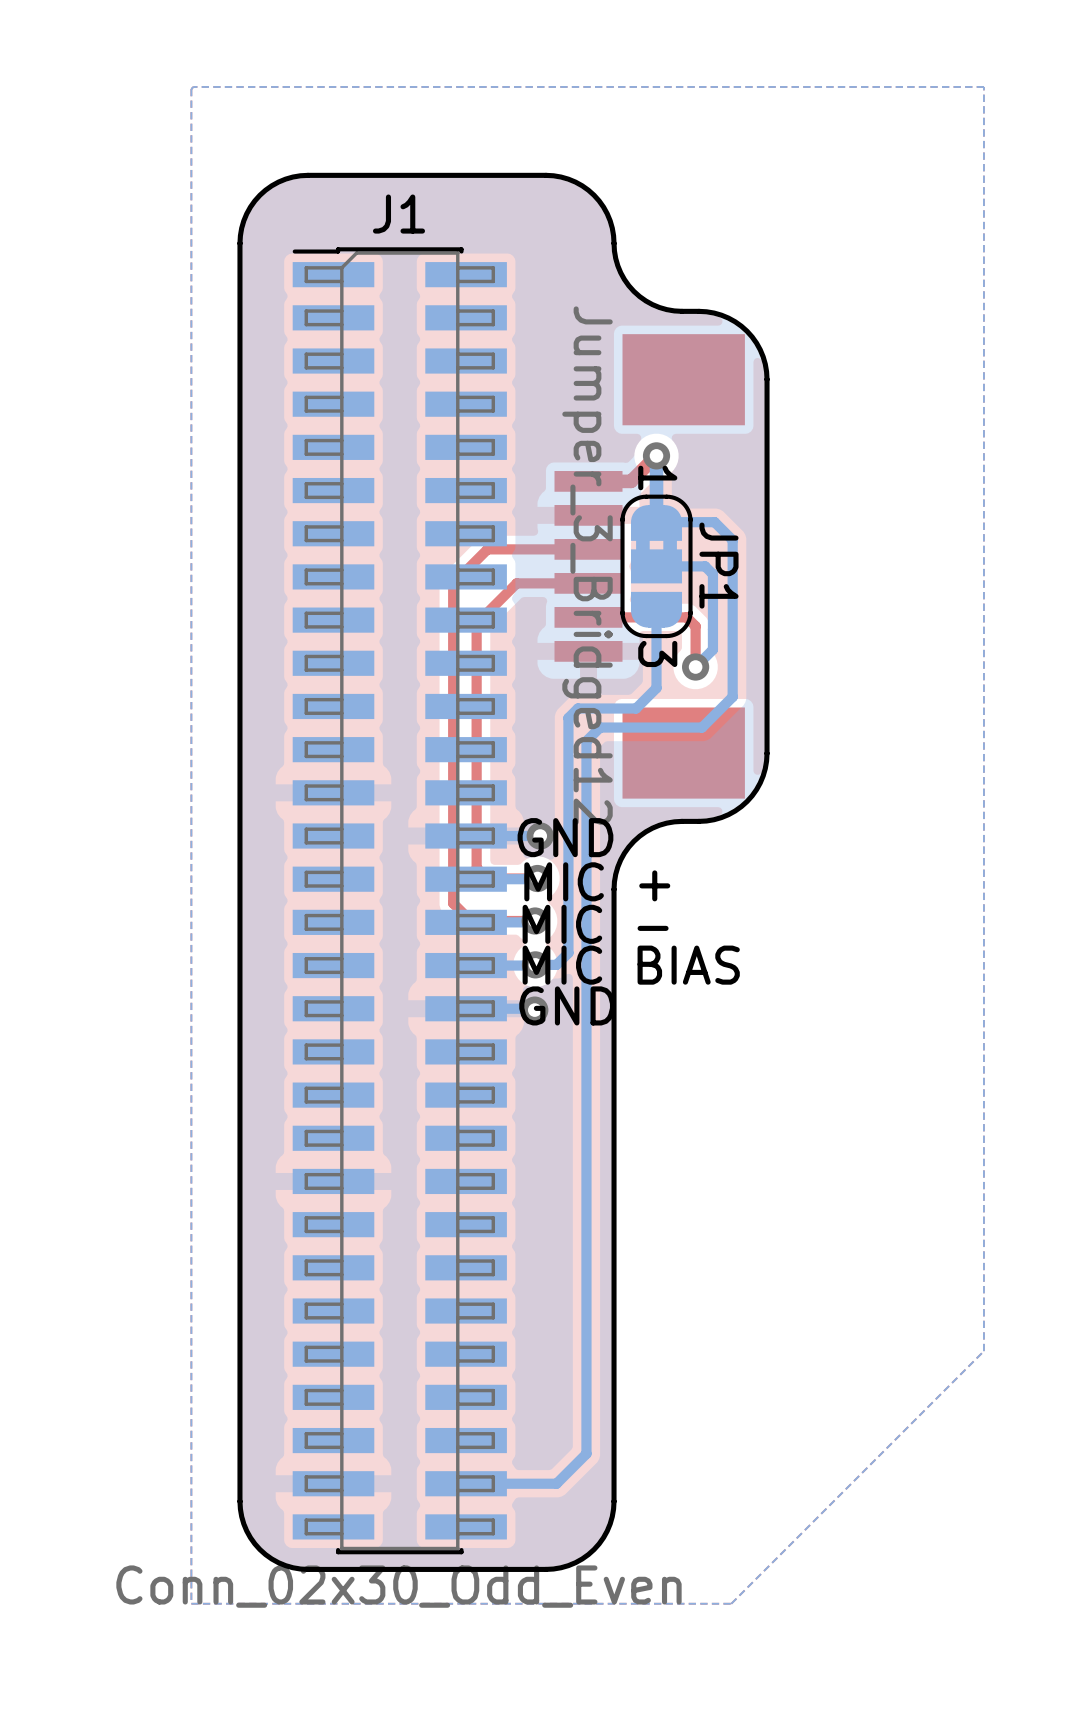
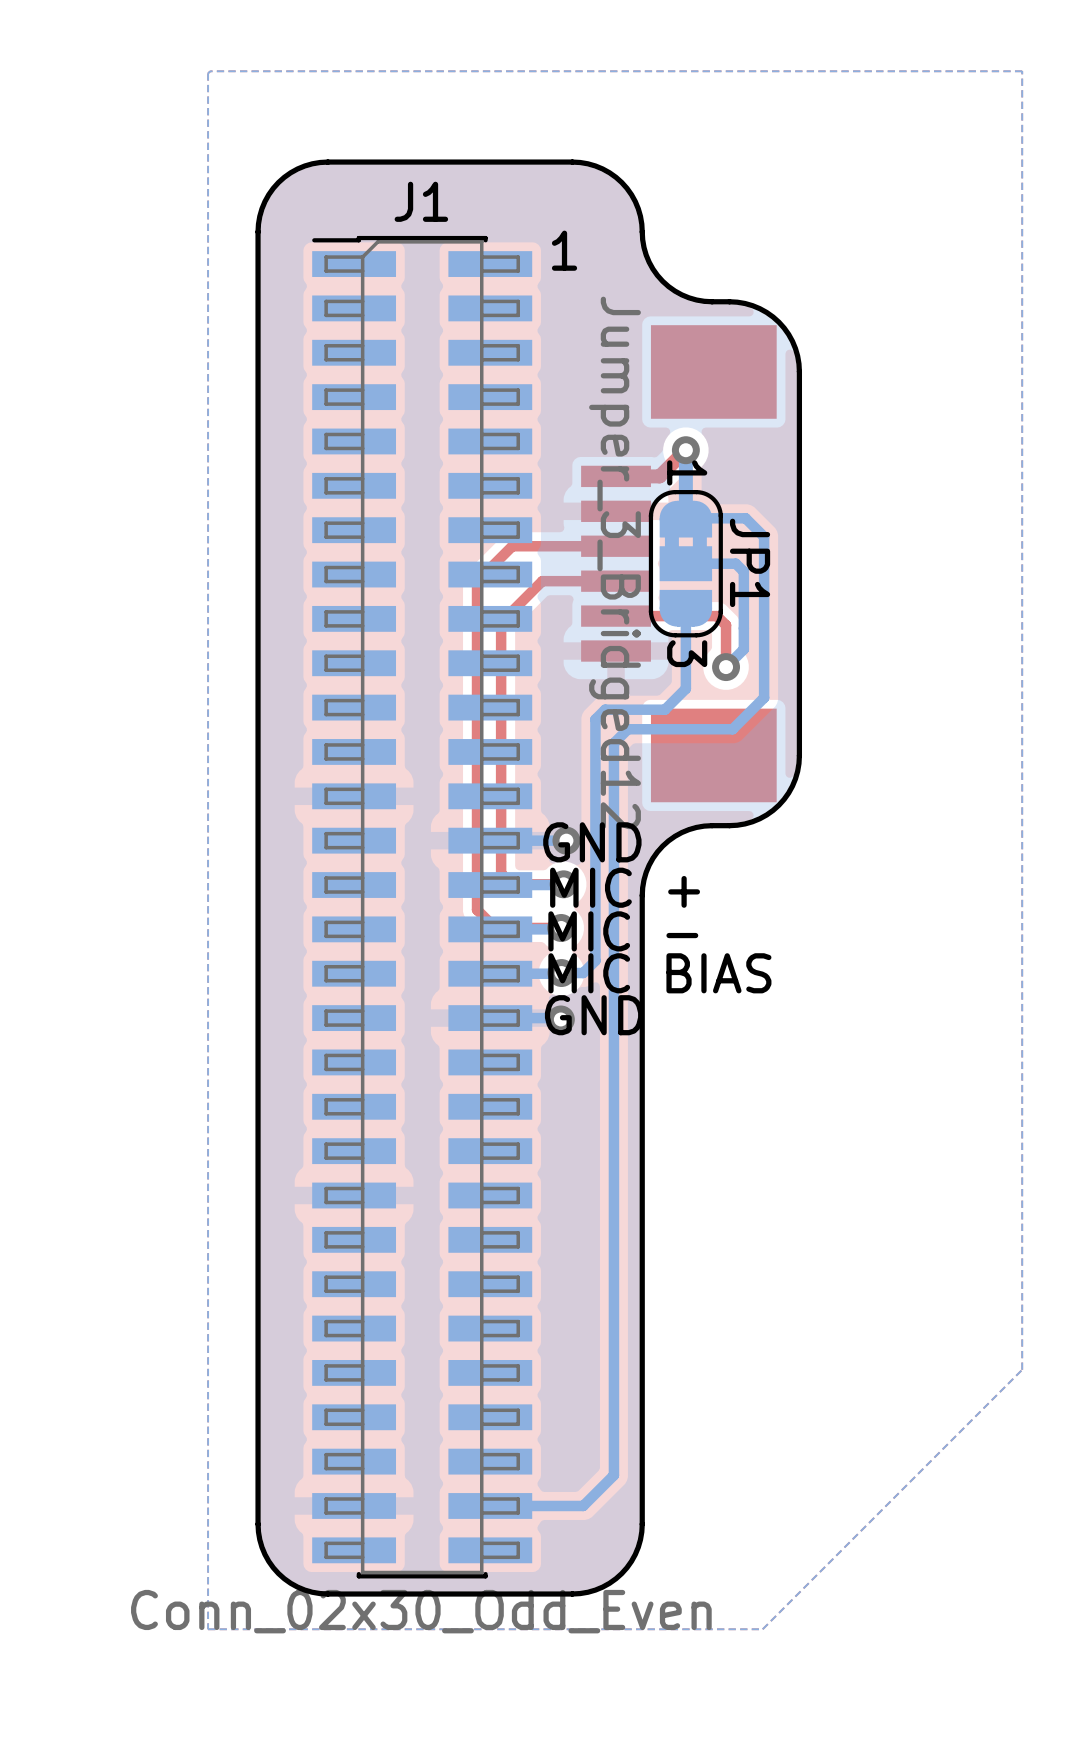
text: none -> 1 (564, 250)

